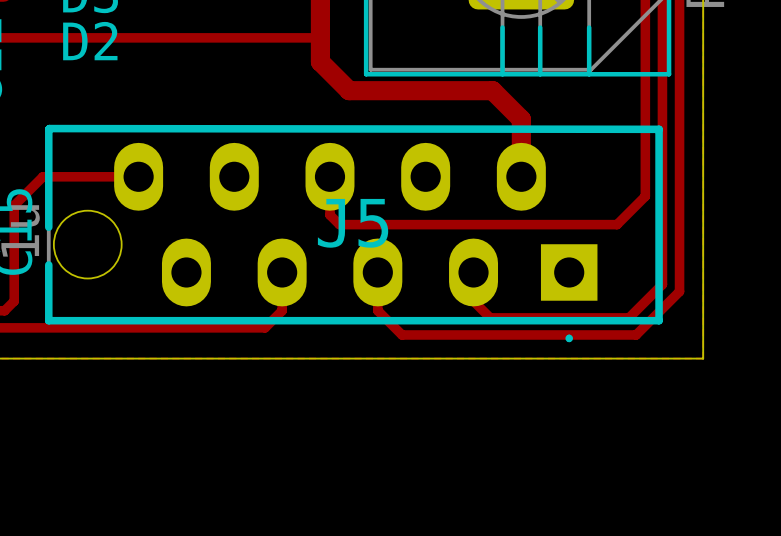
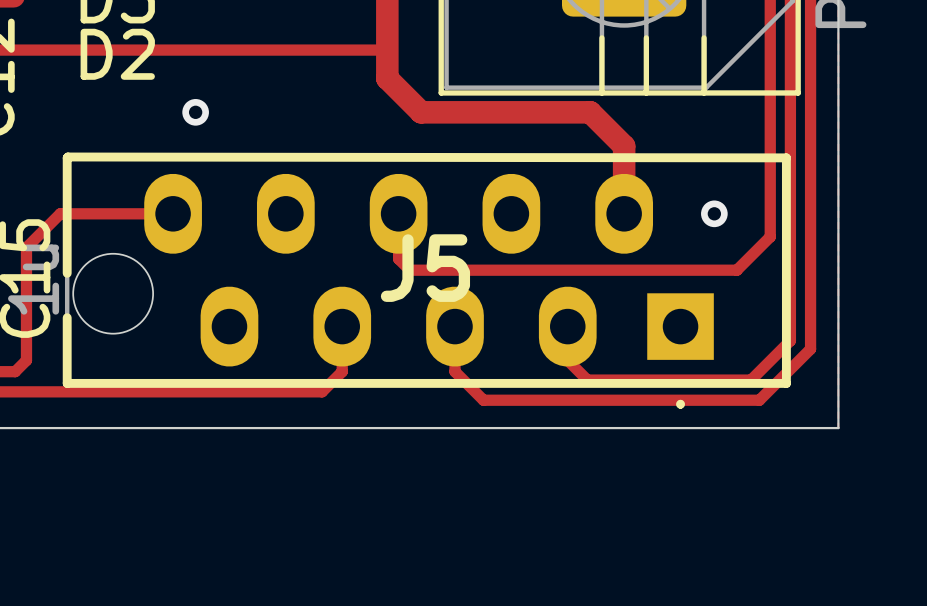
via: none -> (195, 112)
via: none -> (714, 213)

